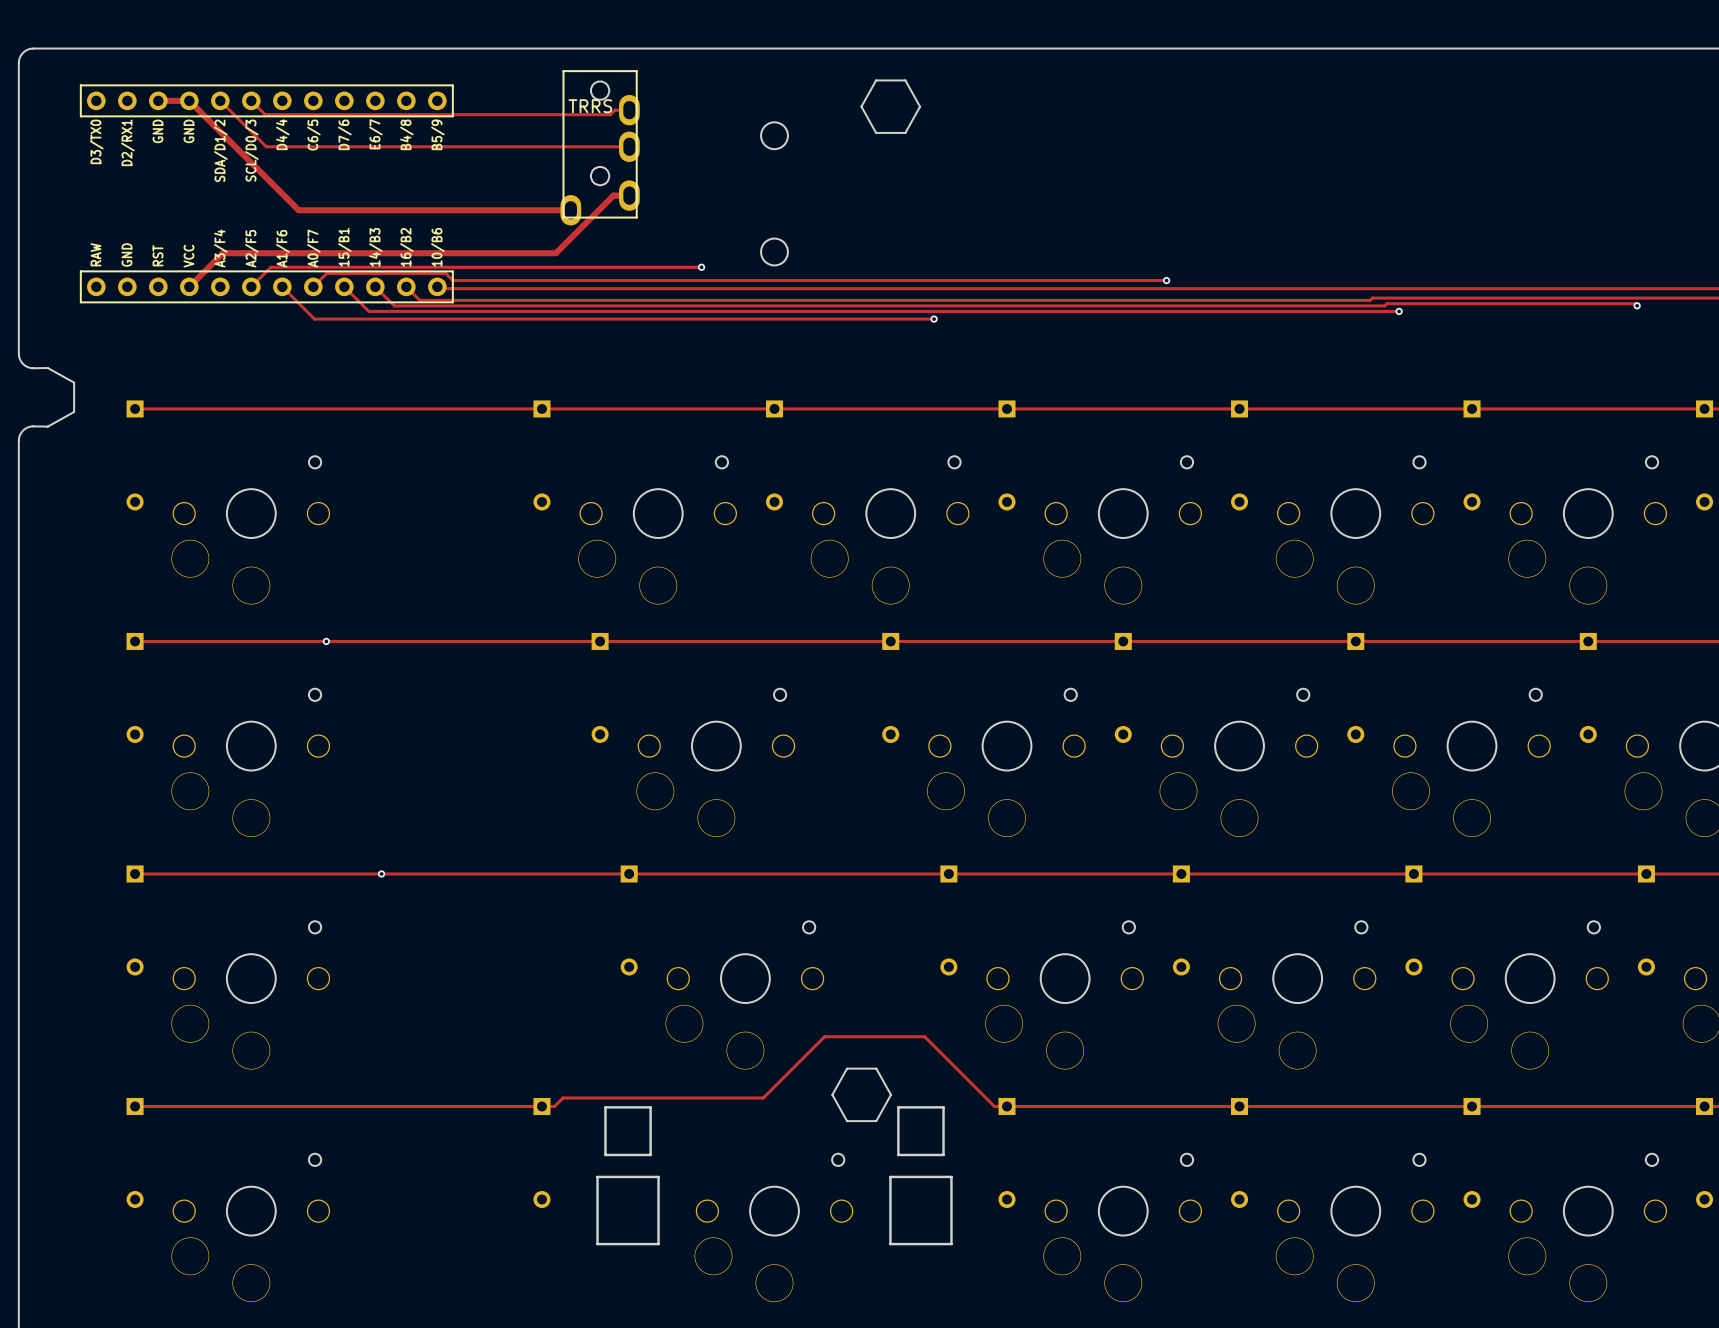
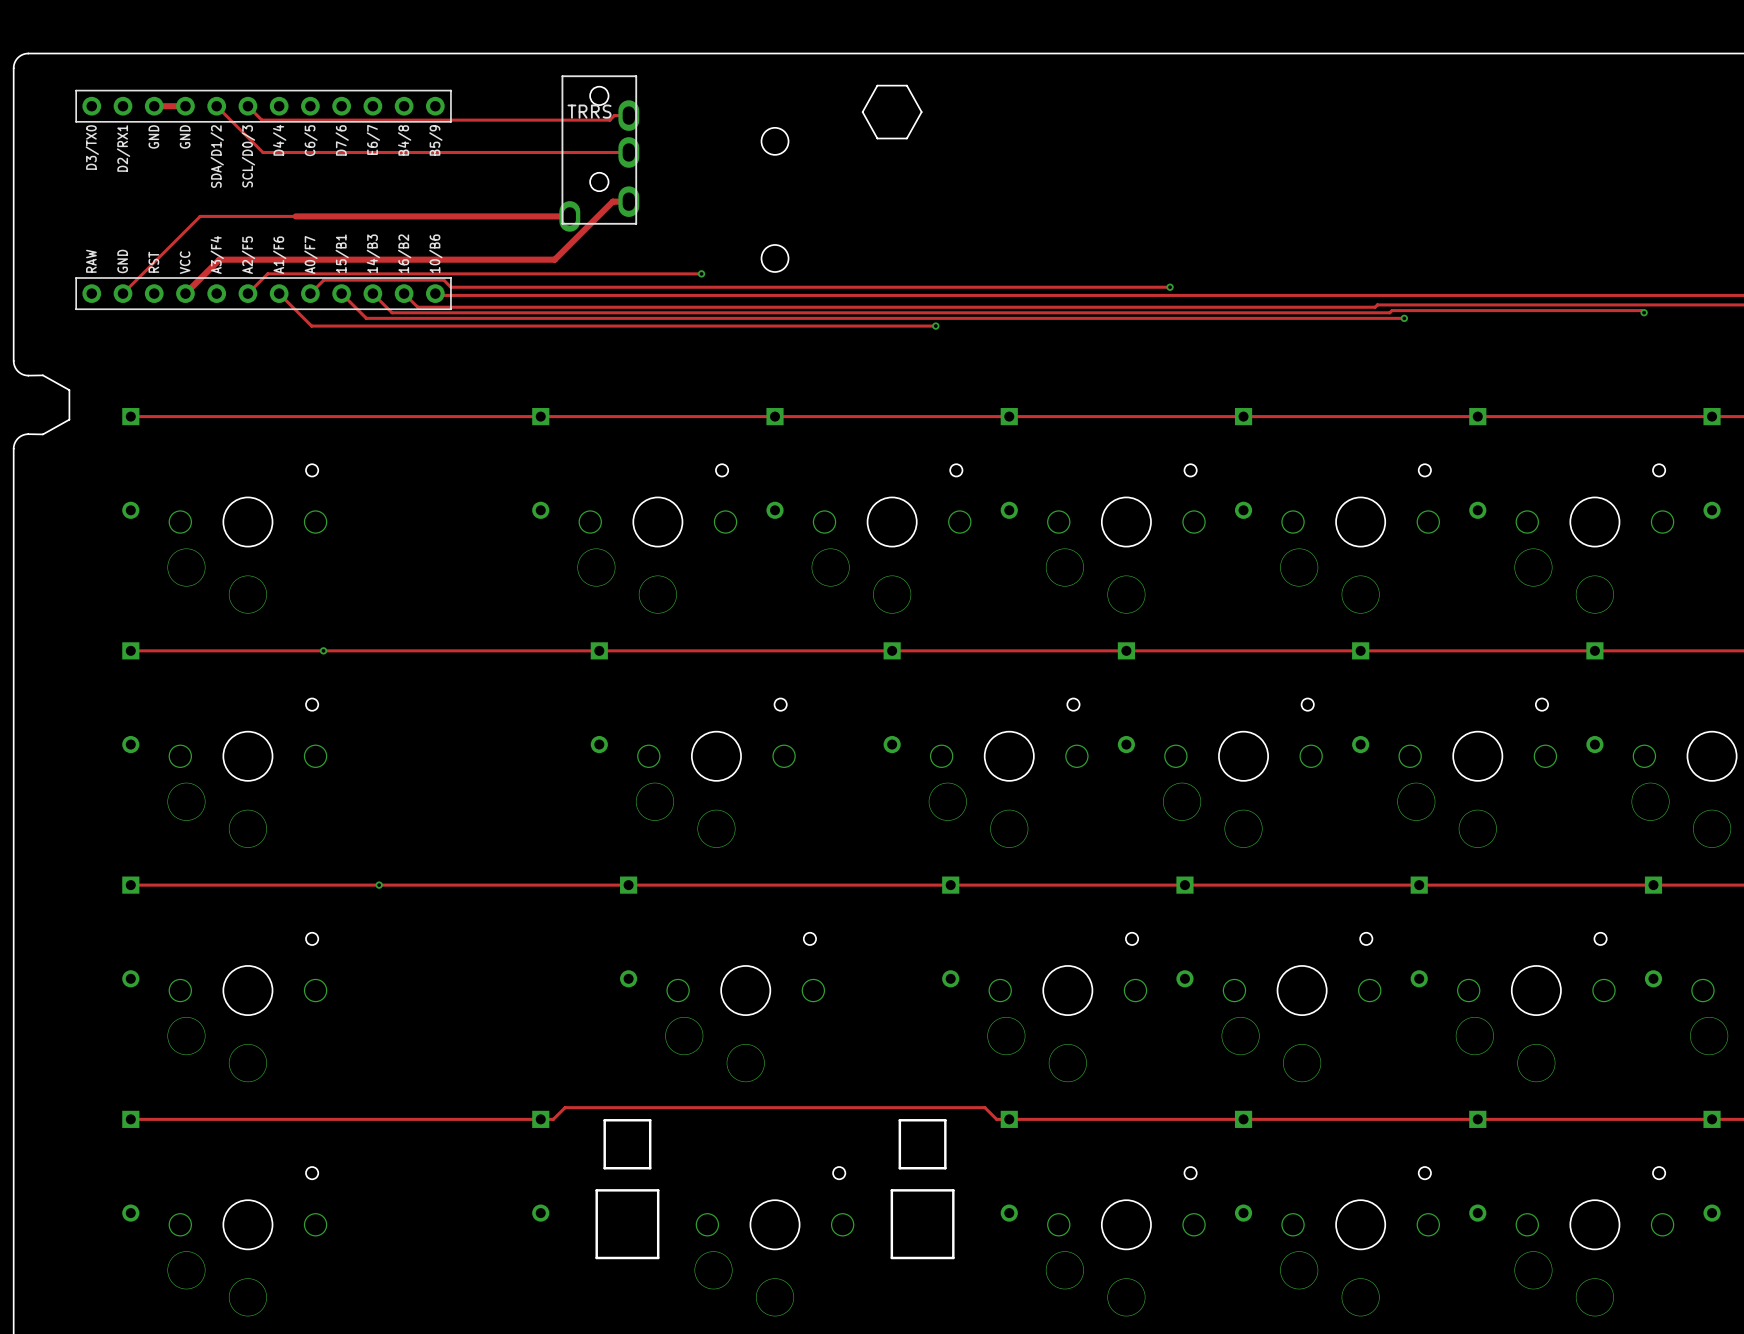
track: (189, 100) (298, 210) -> (123, 293) (200, 216) (295, 216)
drawing: [831, 1068, 892, 1122] -> none
track: (982, 1094) (924, 1036) (824, 1036) (763, 1098) (562, 1098) -> (984, 1107) (565, 1107) (561, 1110)

